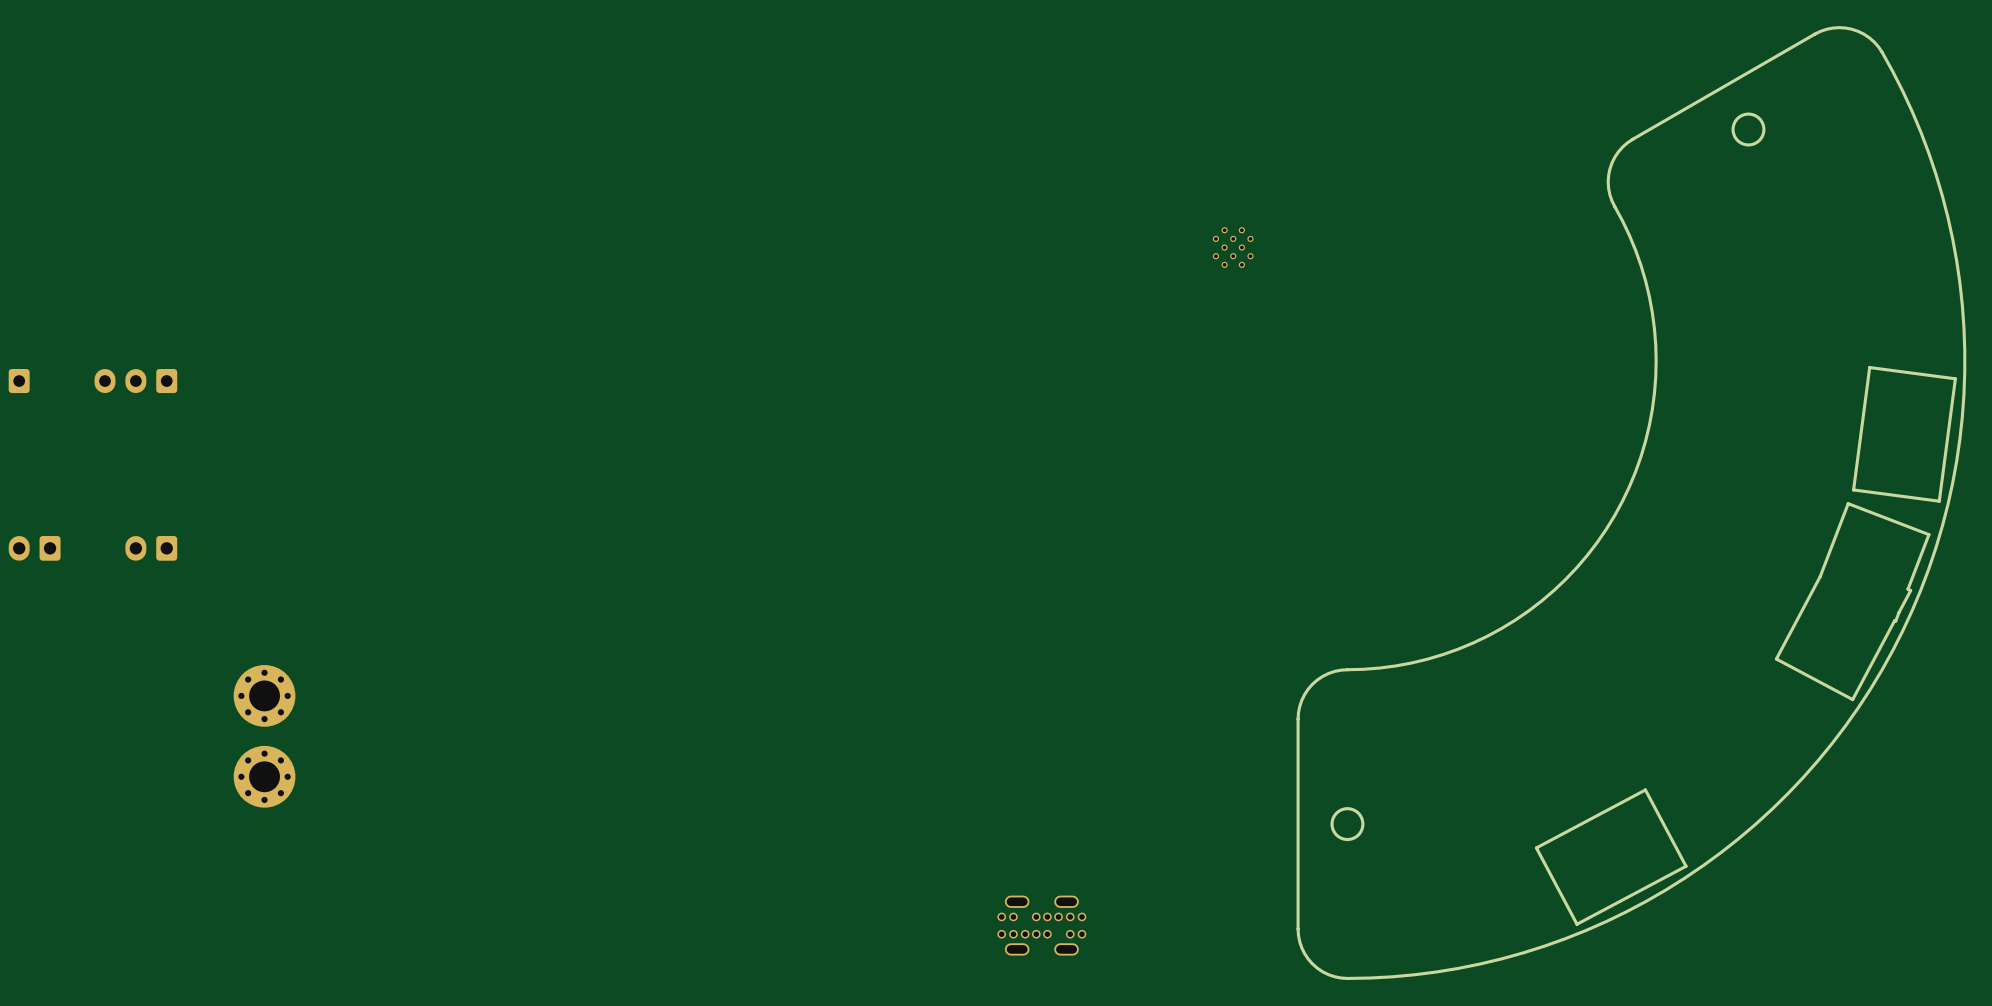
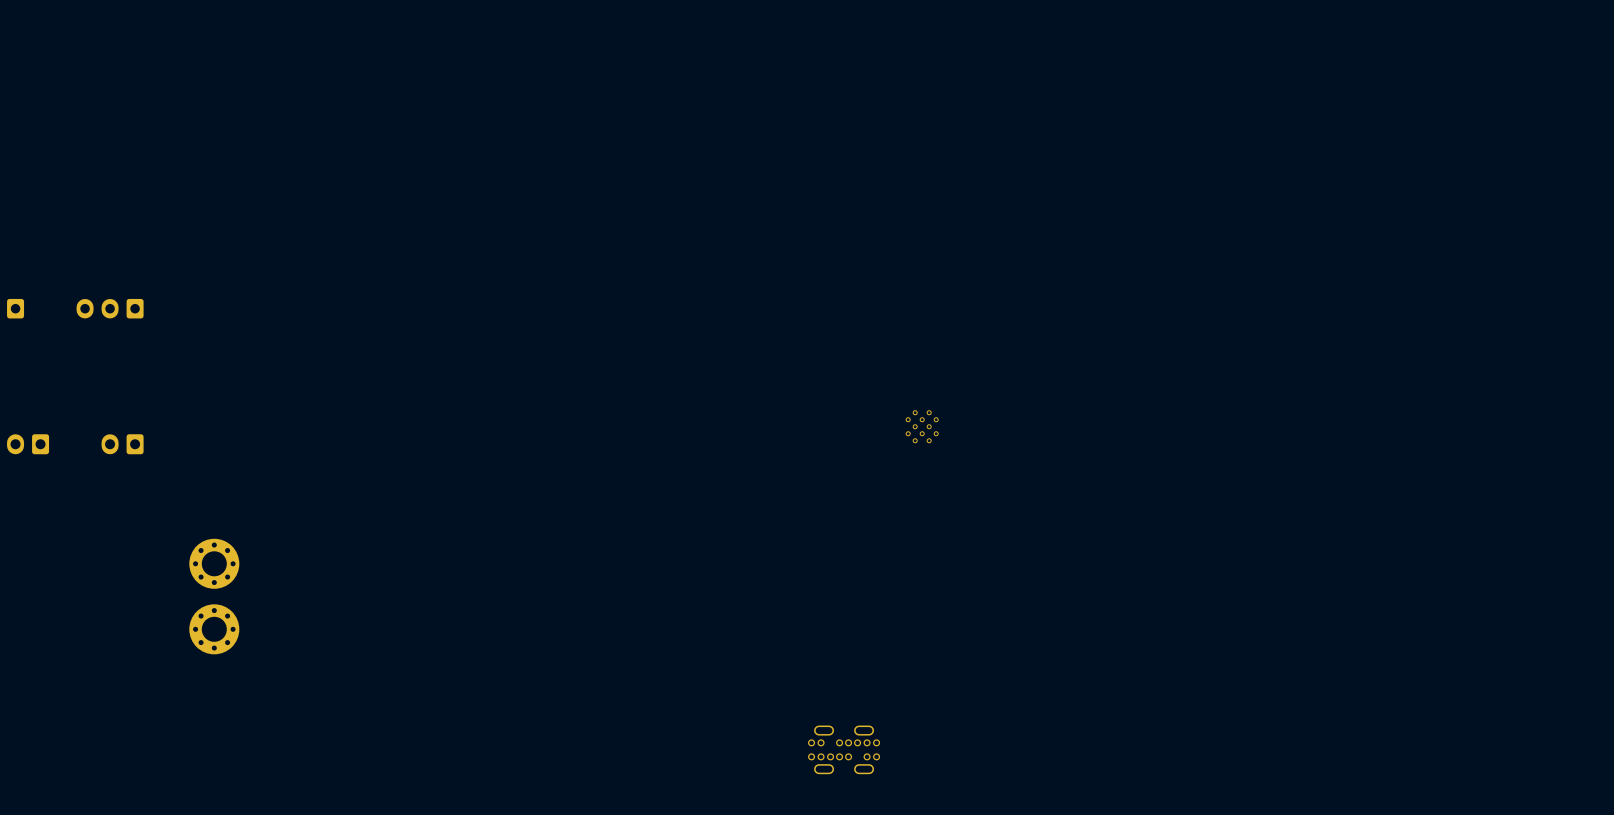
board edge: (1814, 34) (1632, 139) (1618, 151) (1611, 163) (1608, 181) (1609, 194) (1635, 250) (1649, 296) (1655, 344) (1655, 377) (1649, 425) (1635, 471) (1614, 515) (1587, 555) (1565, 579) (1541, 600) (1515, 619) (1487, 636) (1458, 649) (1411, 662) (1379, 668) (1334, 671) (1317, 679) (1304, 694) (1299, 706) (1298, 719) (1298, 929) (1299, 941) (1304, 953) (1312, 963) (1322, 971) (1341, 978) (1369, 978) (1436, 972) (1480, 964) (1523, 952) (1565, 938) (1606, 921) (1646, 901) (1684, 878) (1721, 852) (1755, 824) (1787, 793) (1818, 760) (1845, 725) (1870, 688) (1892, 650) (1912, 610) (1928, 568) (1942, 526) (1952, 482) (1959, 438) (1963, 394) (1964, 349) (1959, 283) (1947, 217) (1936, 174) (1912, 111) (1882, 52) (1869, 37) (1852, 29) (1832, 28) (1814, 34) -> none
round board edge: [1731, 112, 1766, 147] -> none
part position: (1233, 247) -> (922, 426)
board edge: (1869, 367) (1853, 489) (1939, 501) (1955, 378) (1869, 367) -> none
board edge: (1848, 503) (1820, 576) (1776, 659) (1852, 699) (1910, 590) (1908, 589) (1928, 534) (1848, 503) -> none
board edge: (1645, 789) (1686, 866) (1577, 924) (1536, 847) (1645, 789) -> none
round board edge: [1330, 807, 1365, 842] -> none

